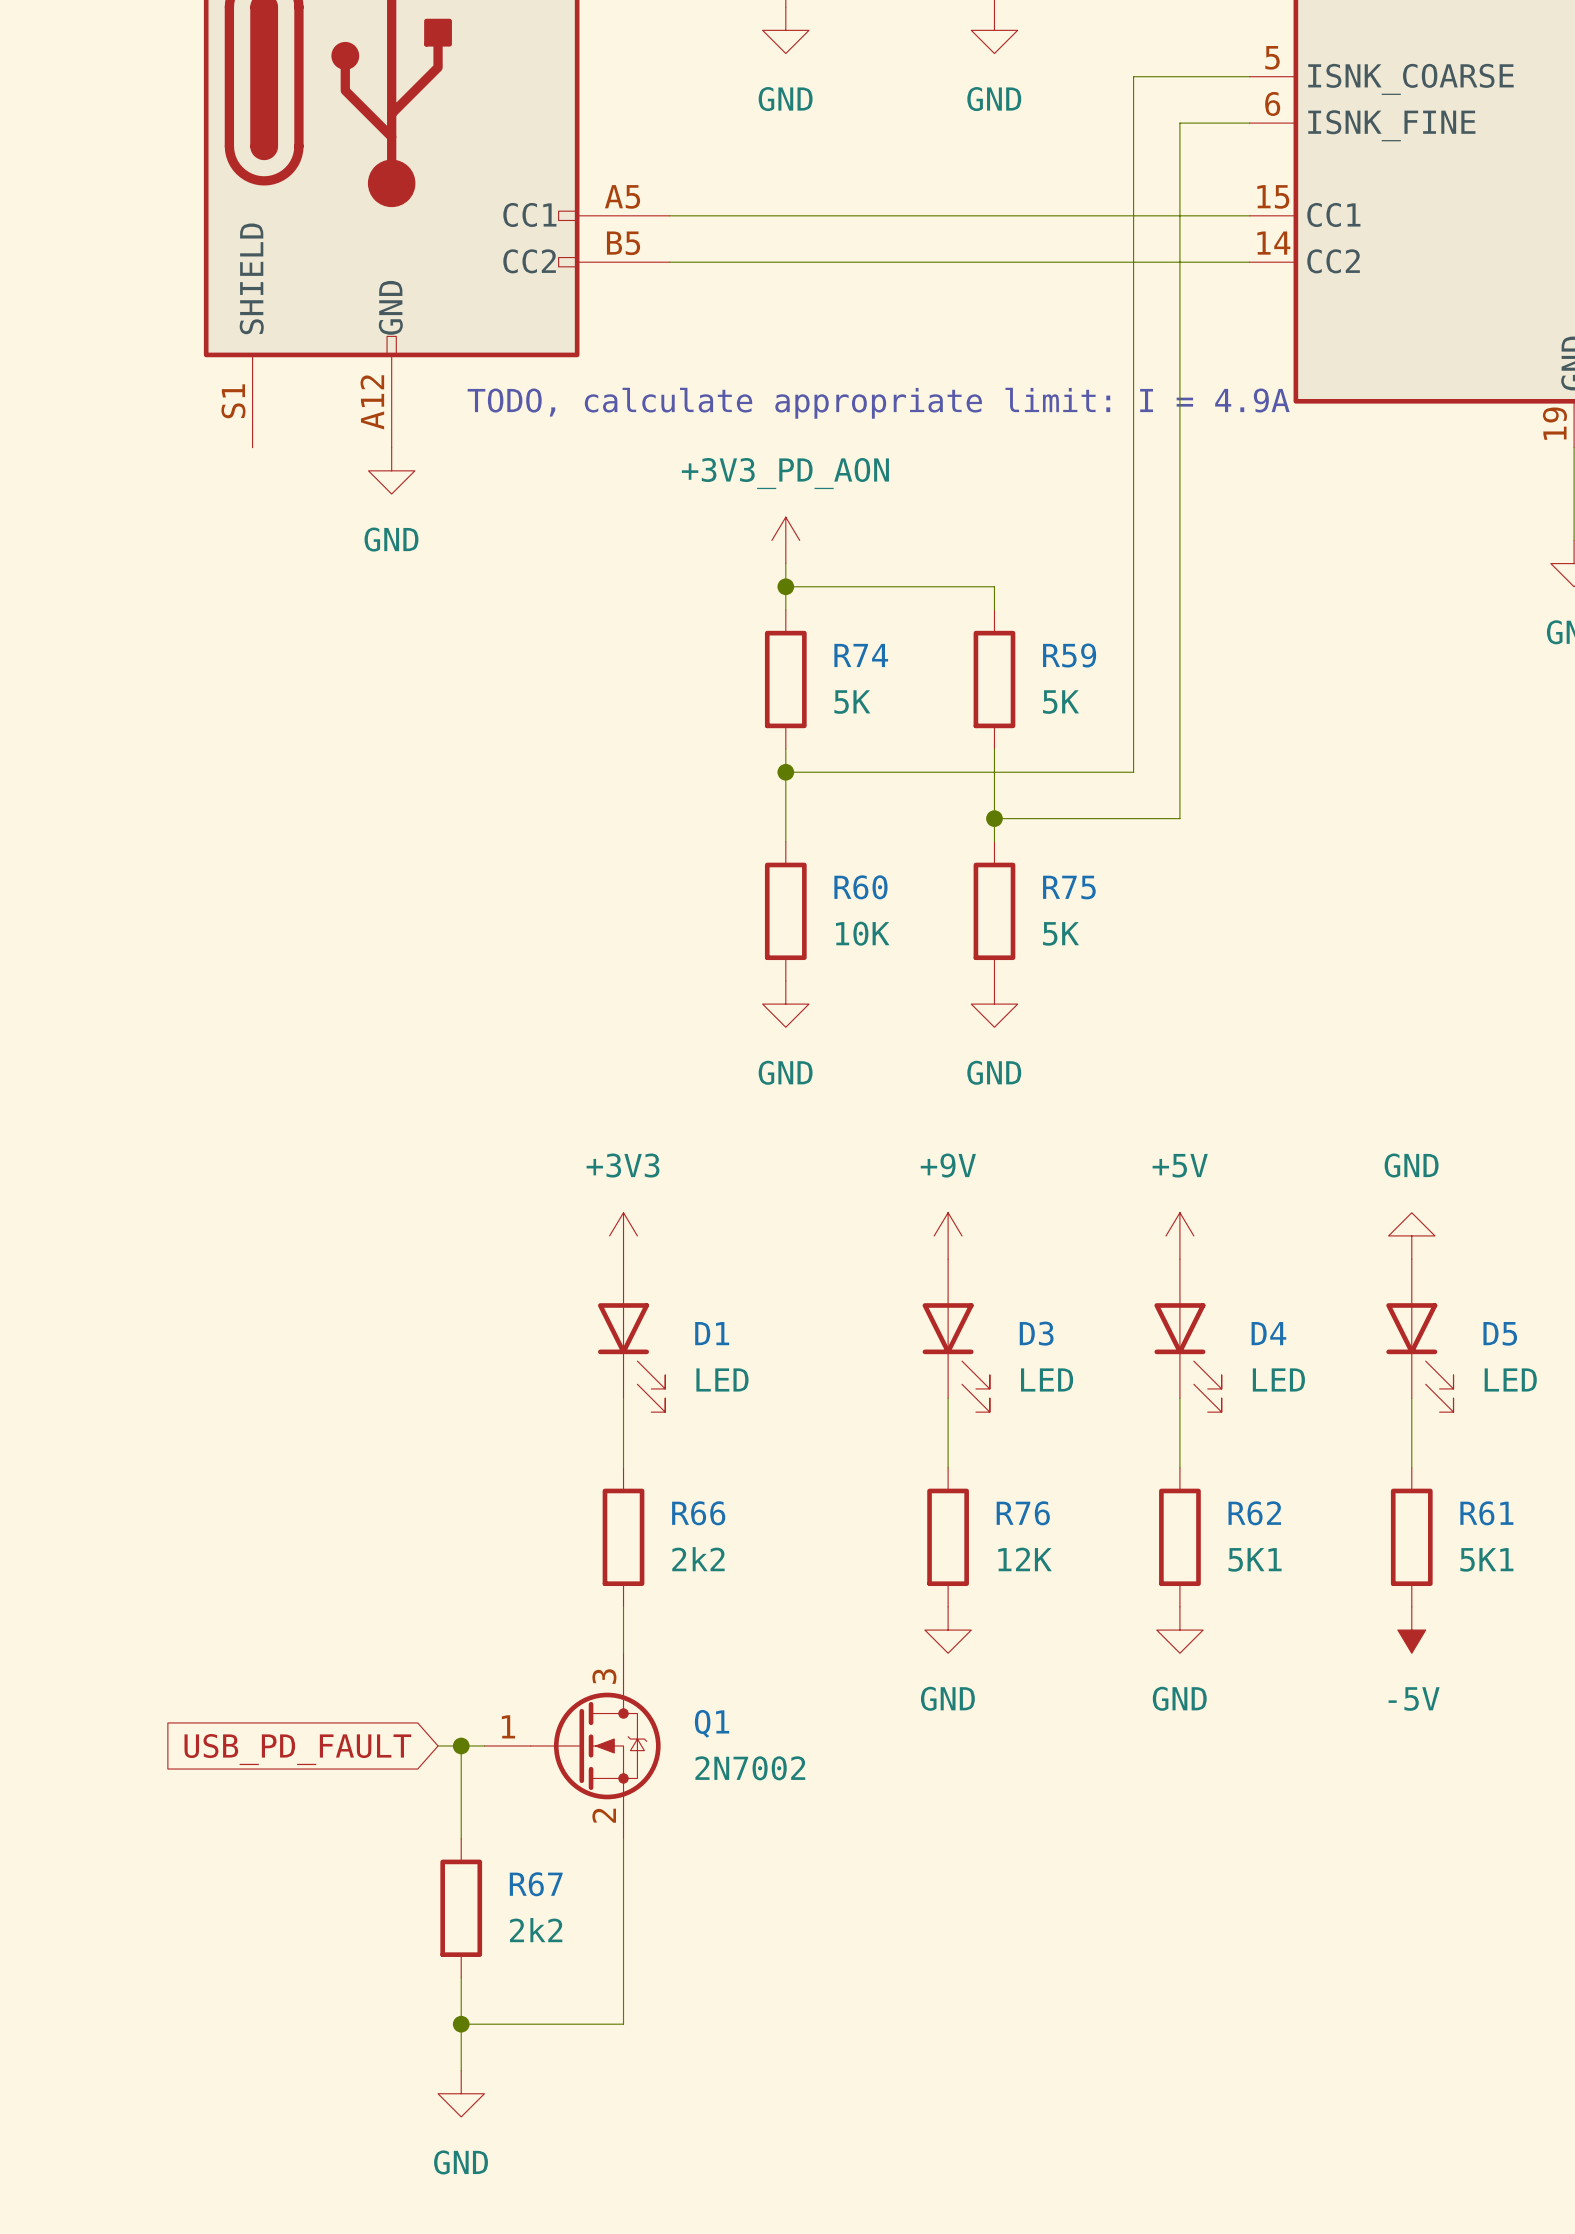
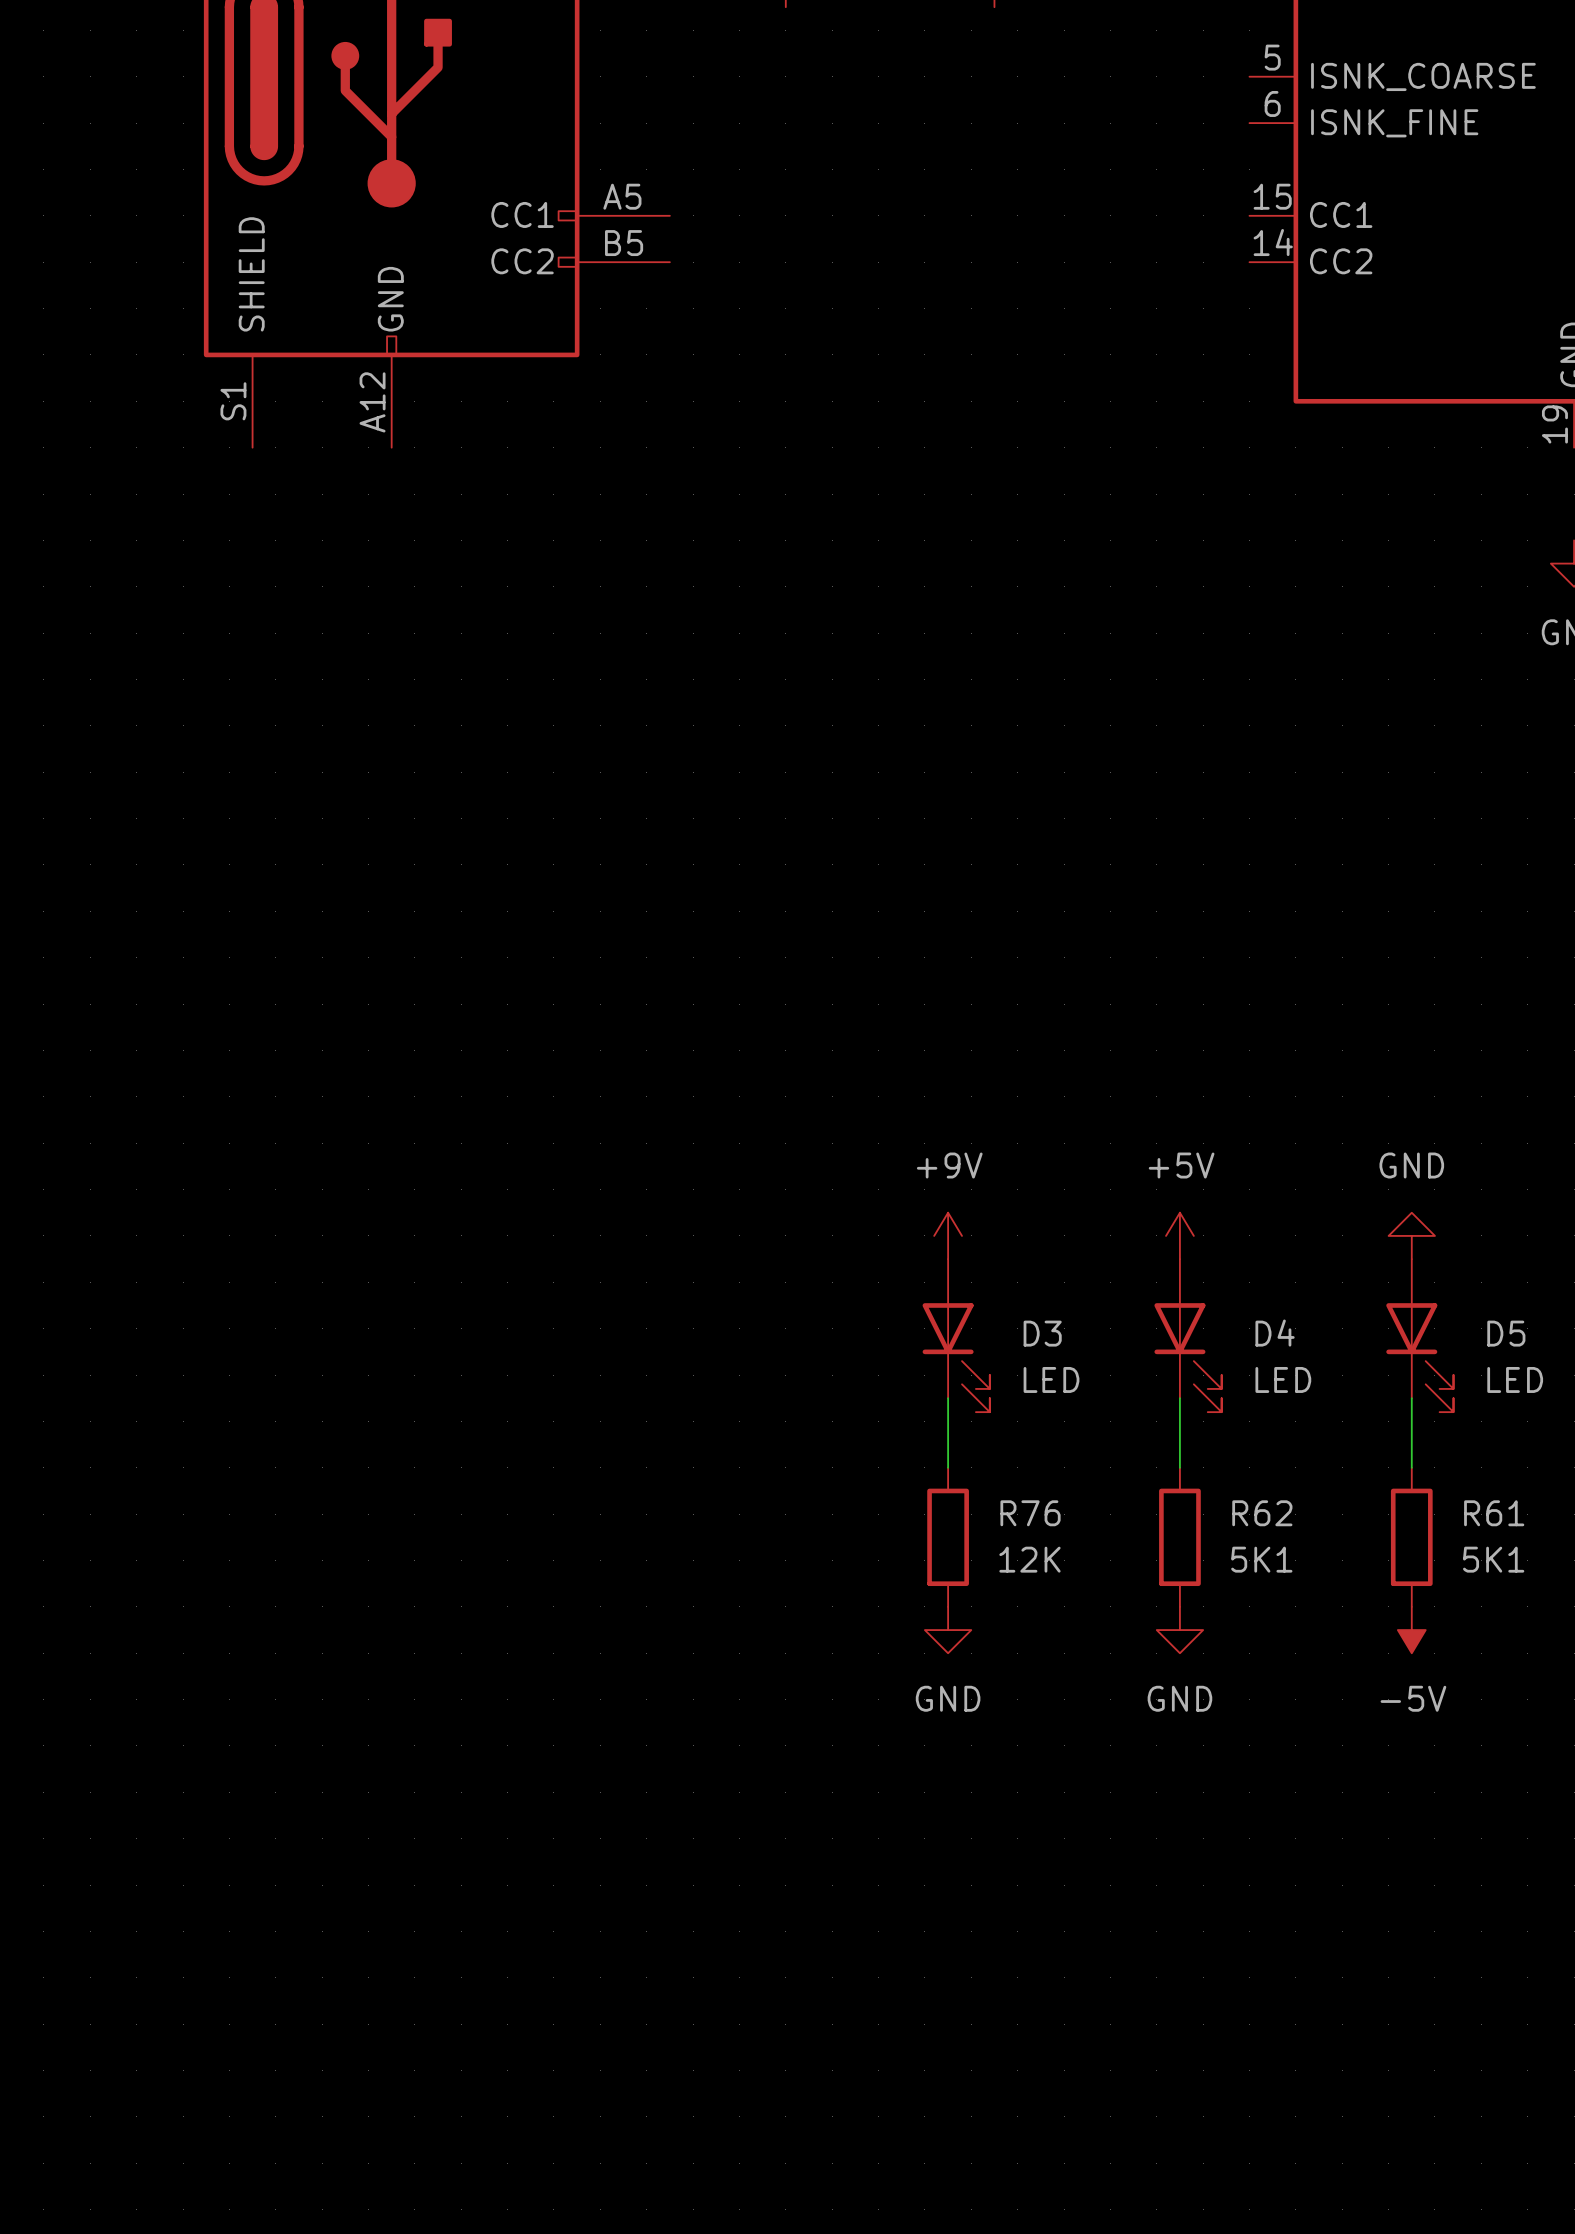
power symbol: GND (785, 30) -> none
power symbol: GND (994, 30) -> none
wire: (1249, 76) (1133, 76) (1133, 772) (785, 772) -> none
wire: (1249, 123) (1179, 123) (1179, 818) (994, 818) -> none
wire: (669, 215) (1249, 215) -> none
wire: (669, 262) (1249, 262) -> none
text: TODO, calculate appropriate limit: I = 4.9A (878, 403) -> none
wire: (1574, 447) (1574, 540) -> none
power symbol: GND (391, 470) -> none
power symbol: +3V3_PD_AON (785, 540) -> none
wire: (785, 563) (785, 609) -> none
wire: (785, 586) (994, 586) (994, 609) -> none
junction: (785, 586) -> none
R74: 5K (785, 679) -> none
R59: 5K (994, 679) -> none
wire: (785, 749) (785, 841) -> none
wire: (994, 749) (994, 841) -> none
junction: (785, 772) -> none
junction: (994, 818) -> none
R60: 10K (785, 911) -> none
R75: 5K (994, 911) -> none
power symbol: GND (785, 1004) -> none
power symbol: GND (994, 1004) -> none
power symbol: +3V3 (623, 1235) -> none
D1: LED (631, 1335) -> none
wire: (623, 1398) (623, 1467) -> none
R66: 2k2 (623, 1537) -> none
wire: (623, 1606) (623, 1653) -> none
wire: (438, 1745) (484, 1745) -> none
wire: (461, 1745) (461, 1838) -> none
junction: (461, 1745) -> none
Q1: 2N7002 (572, 1745) -> none
global label: USB_PD_FAULT (297, 1749) -> none
wire: (623, 1838) (623, 2024) (461, 2024) -> none
R67: 2k2 (461, 1908) -> none
wire: (461, 1977) (461, 2070) -> none
junction: (461, 2024) -> none
power symbol: GND (461, 2093) -> none

